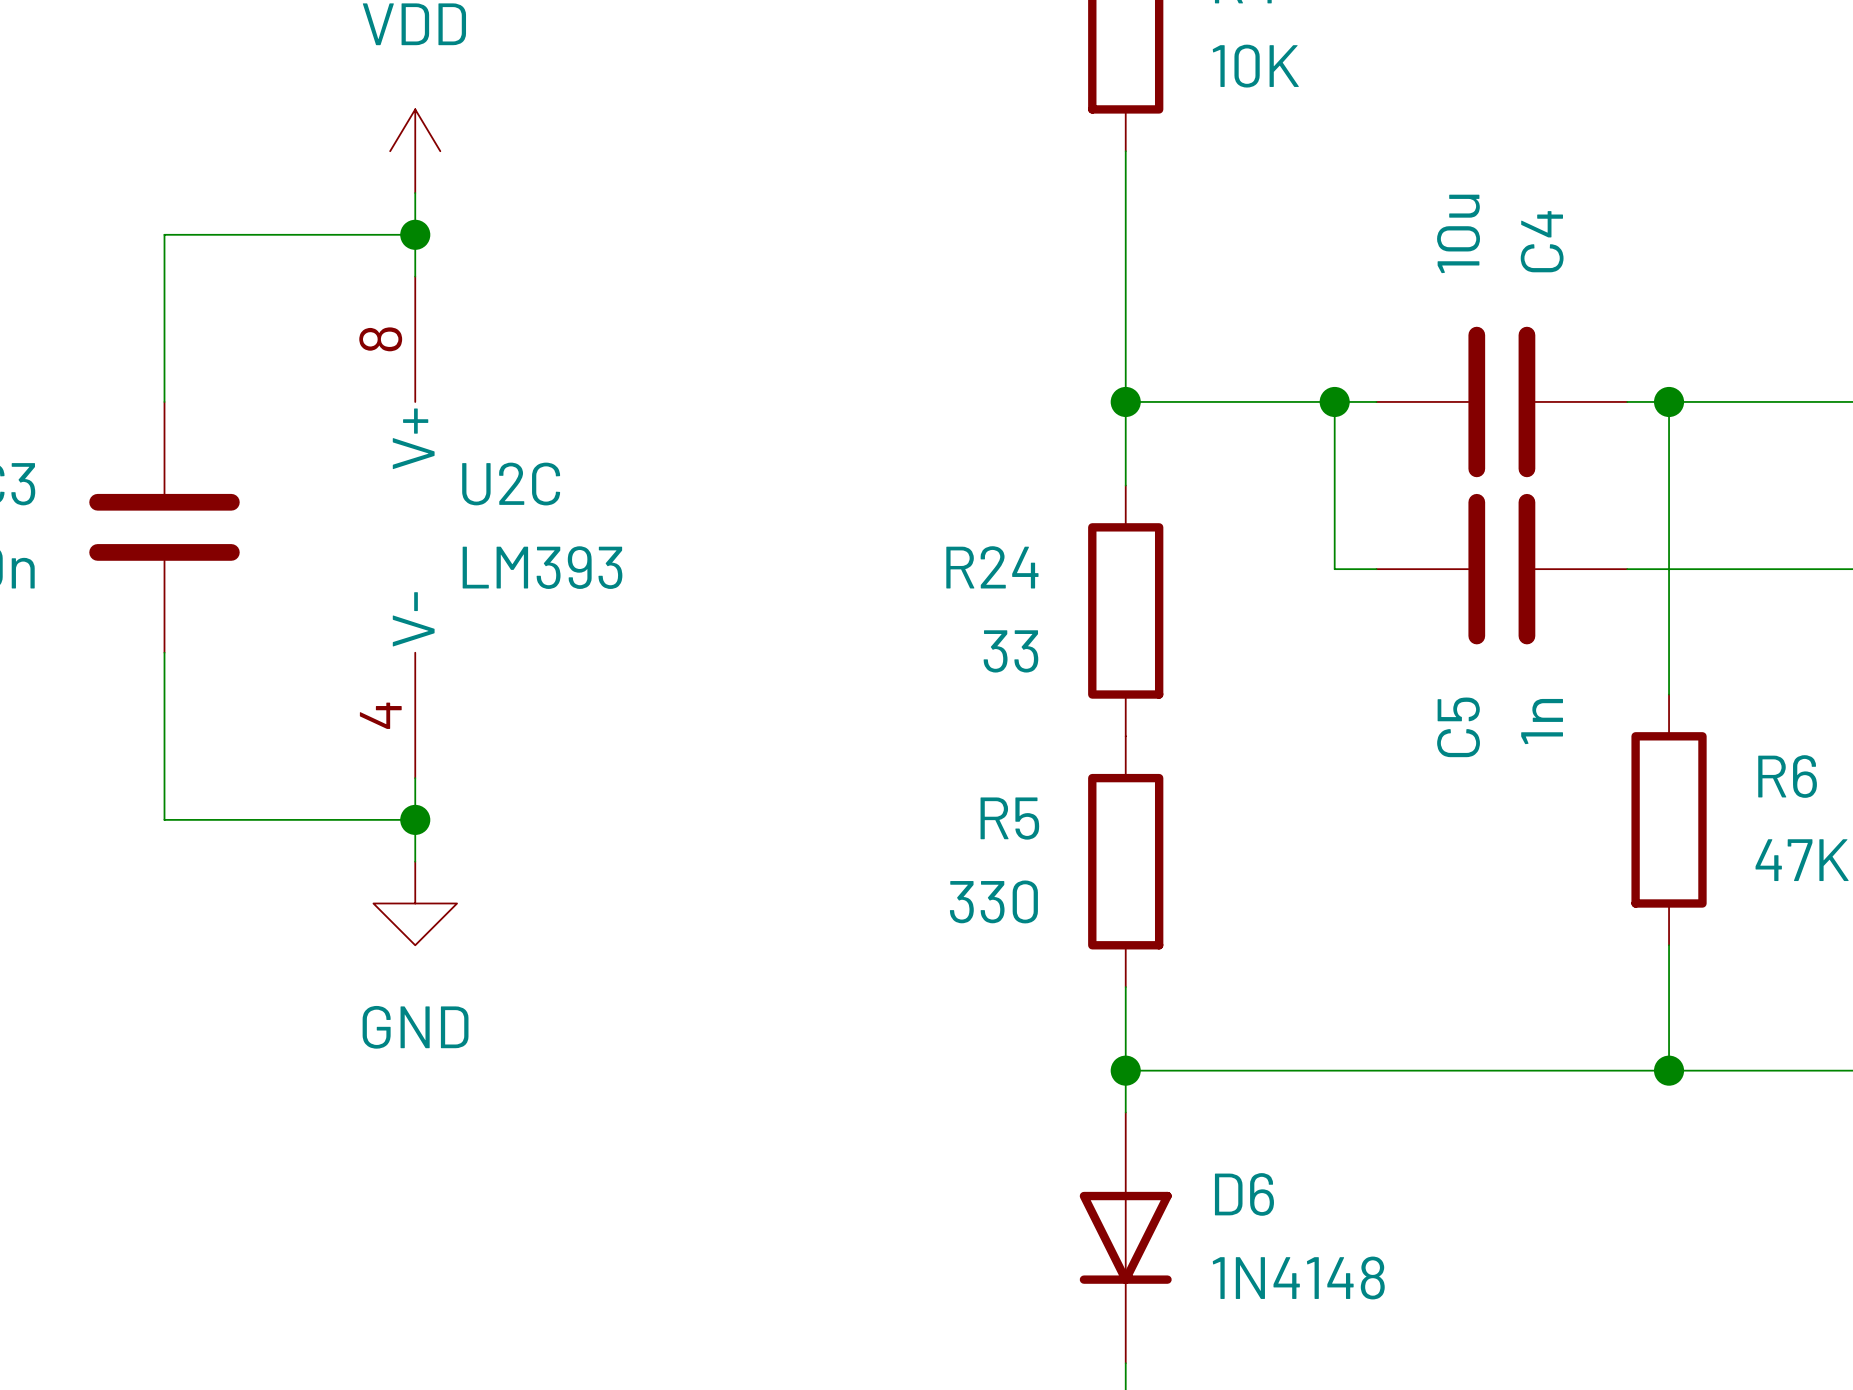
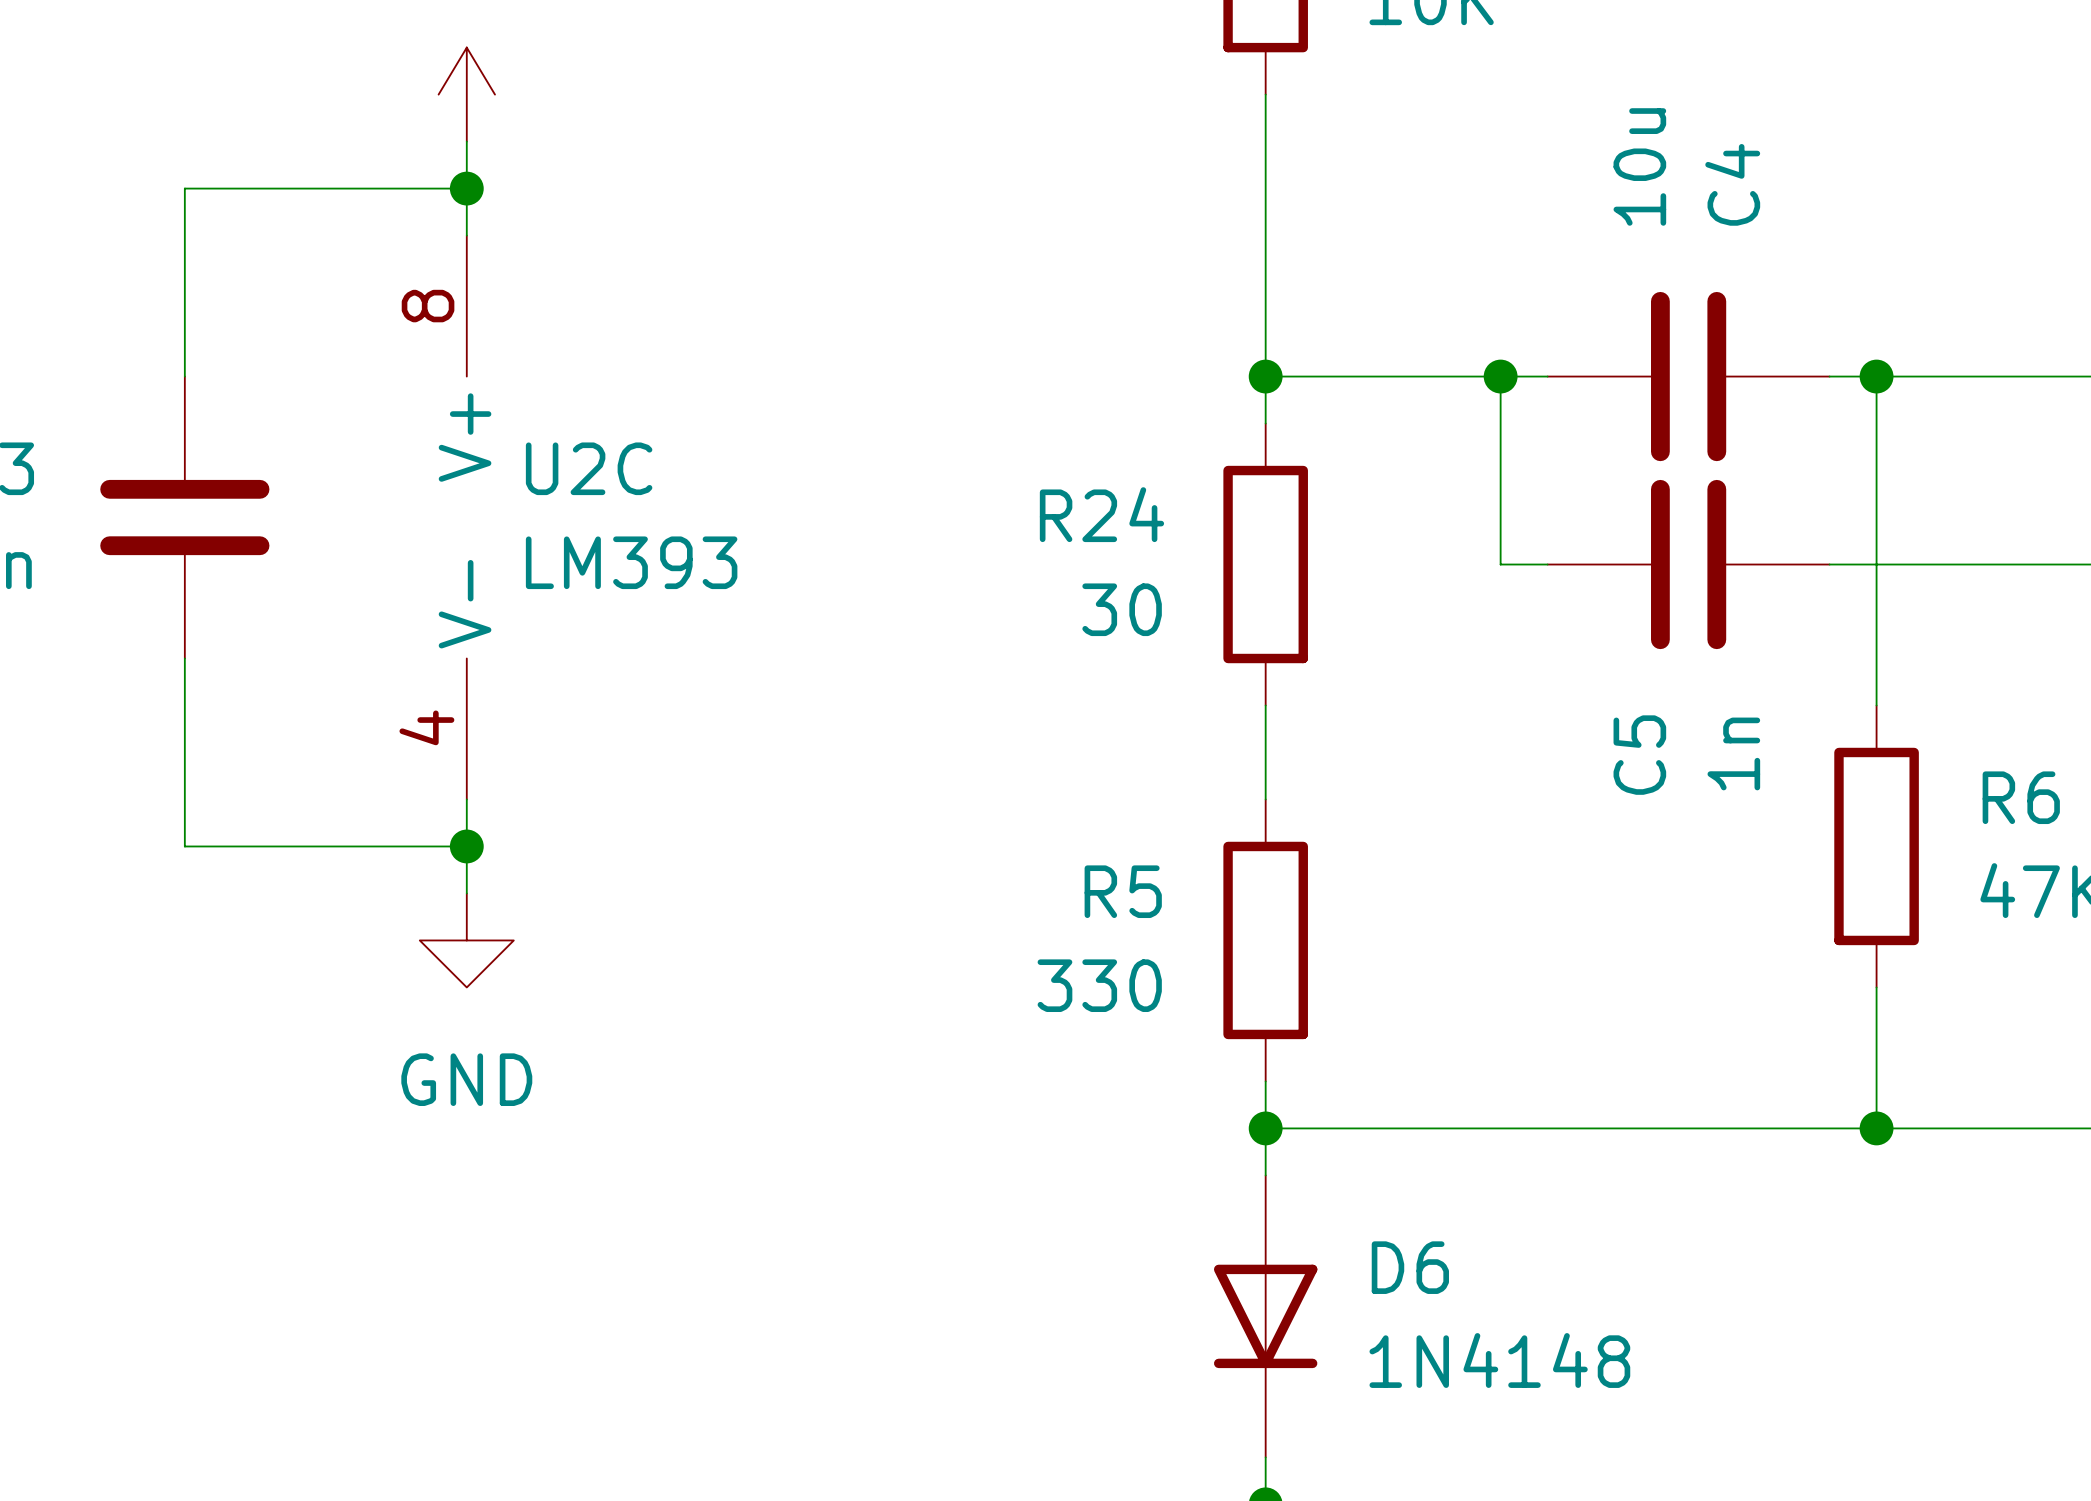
R24 position: (1125, 610) -> (1265, 564)
R24 value: 33 (1010, 651) -> 30 (1122, 609)
R5 position: (1125, 861) -> (1265, 940)

